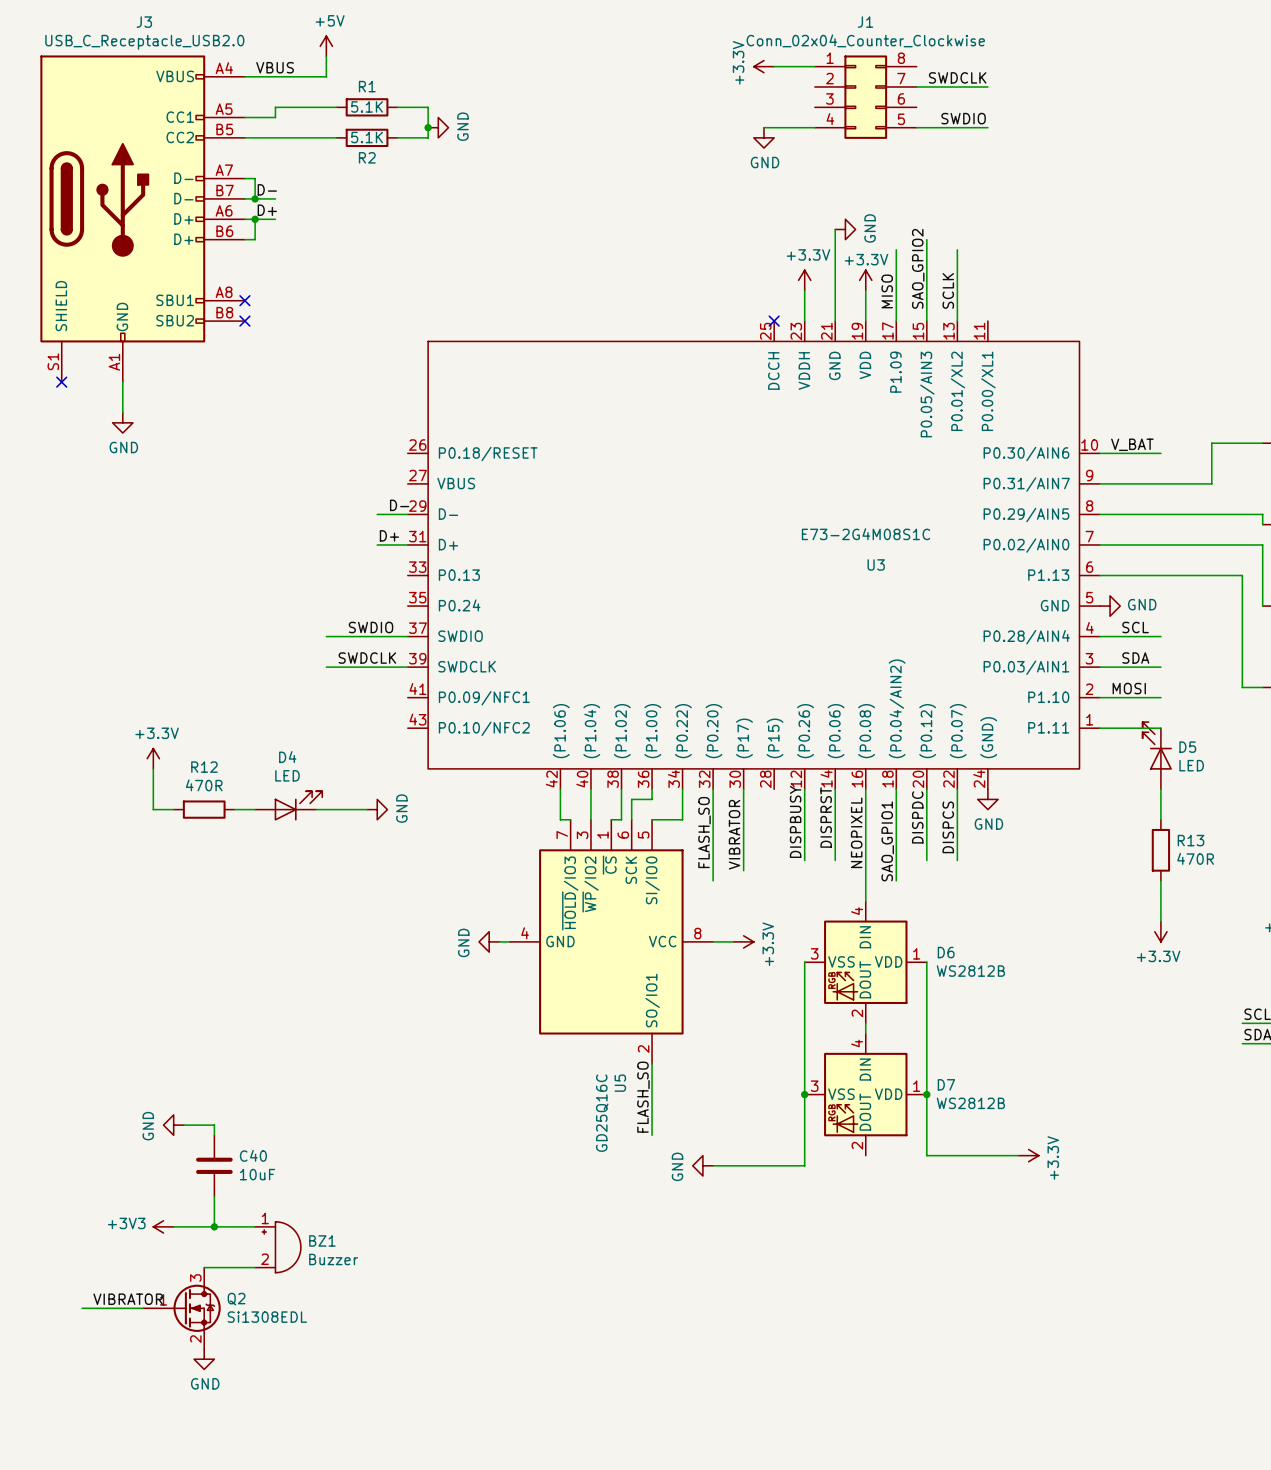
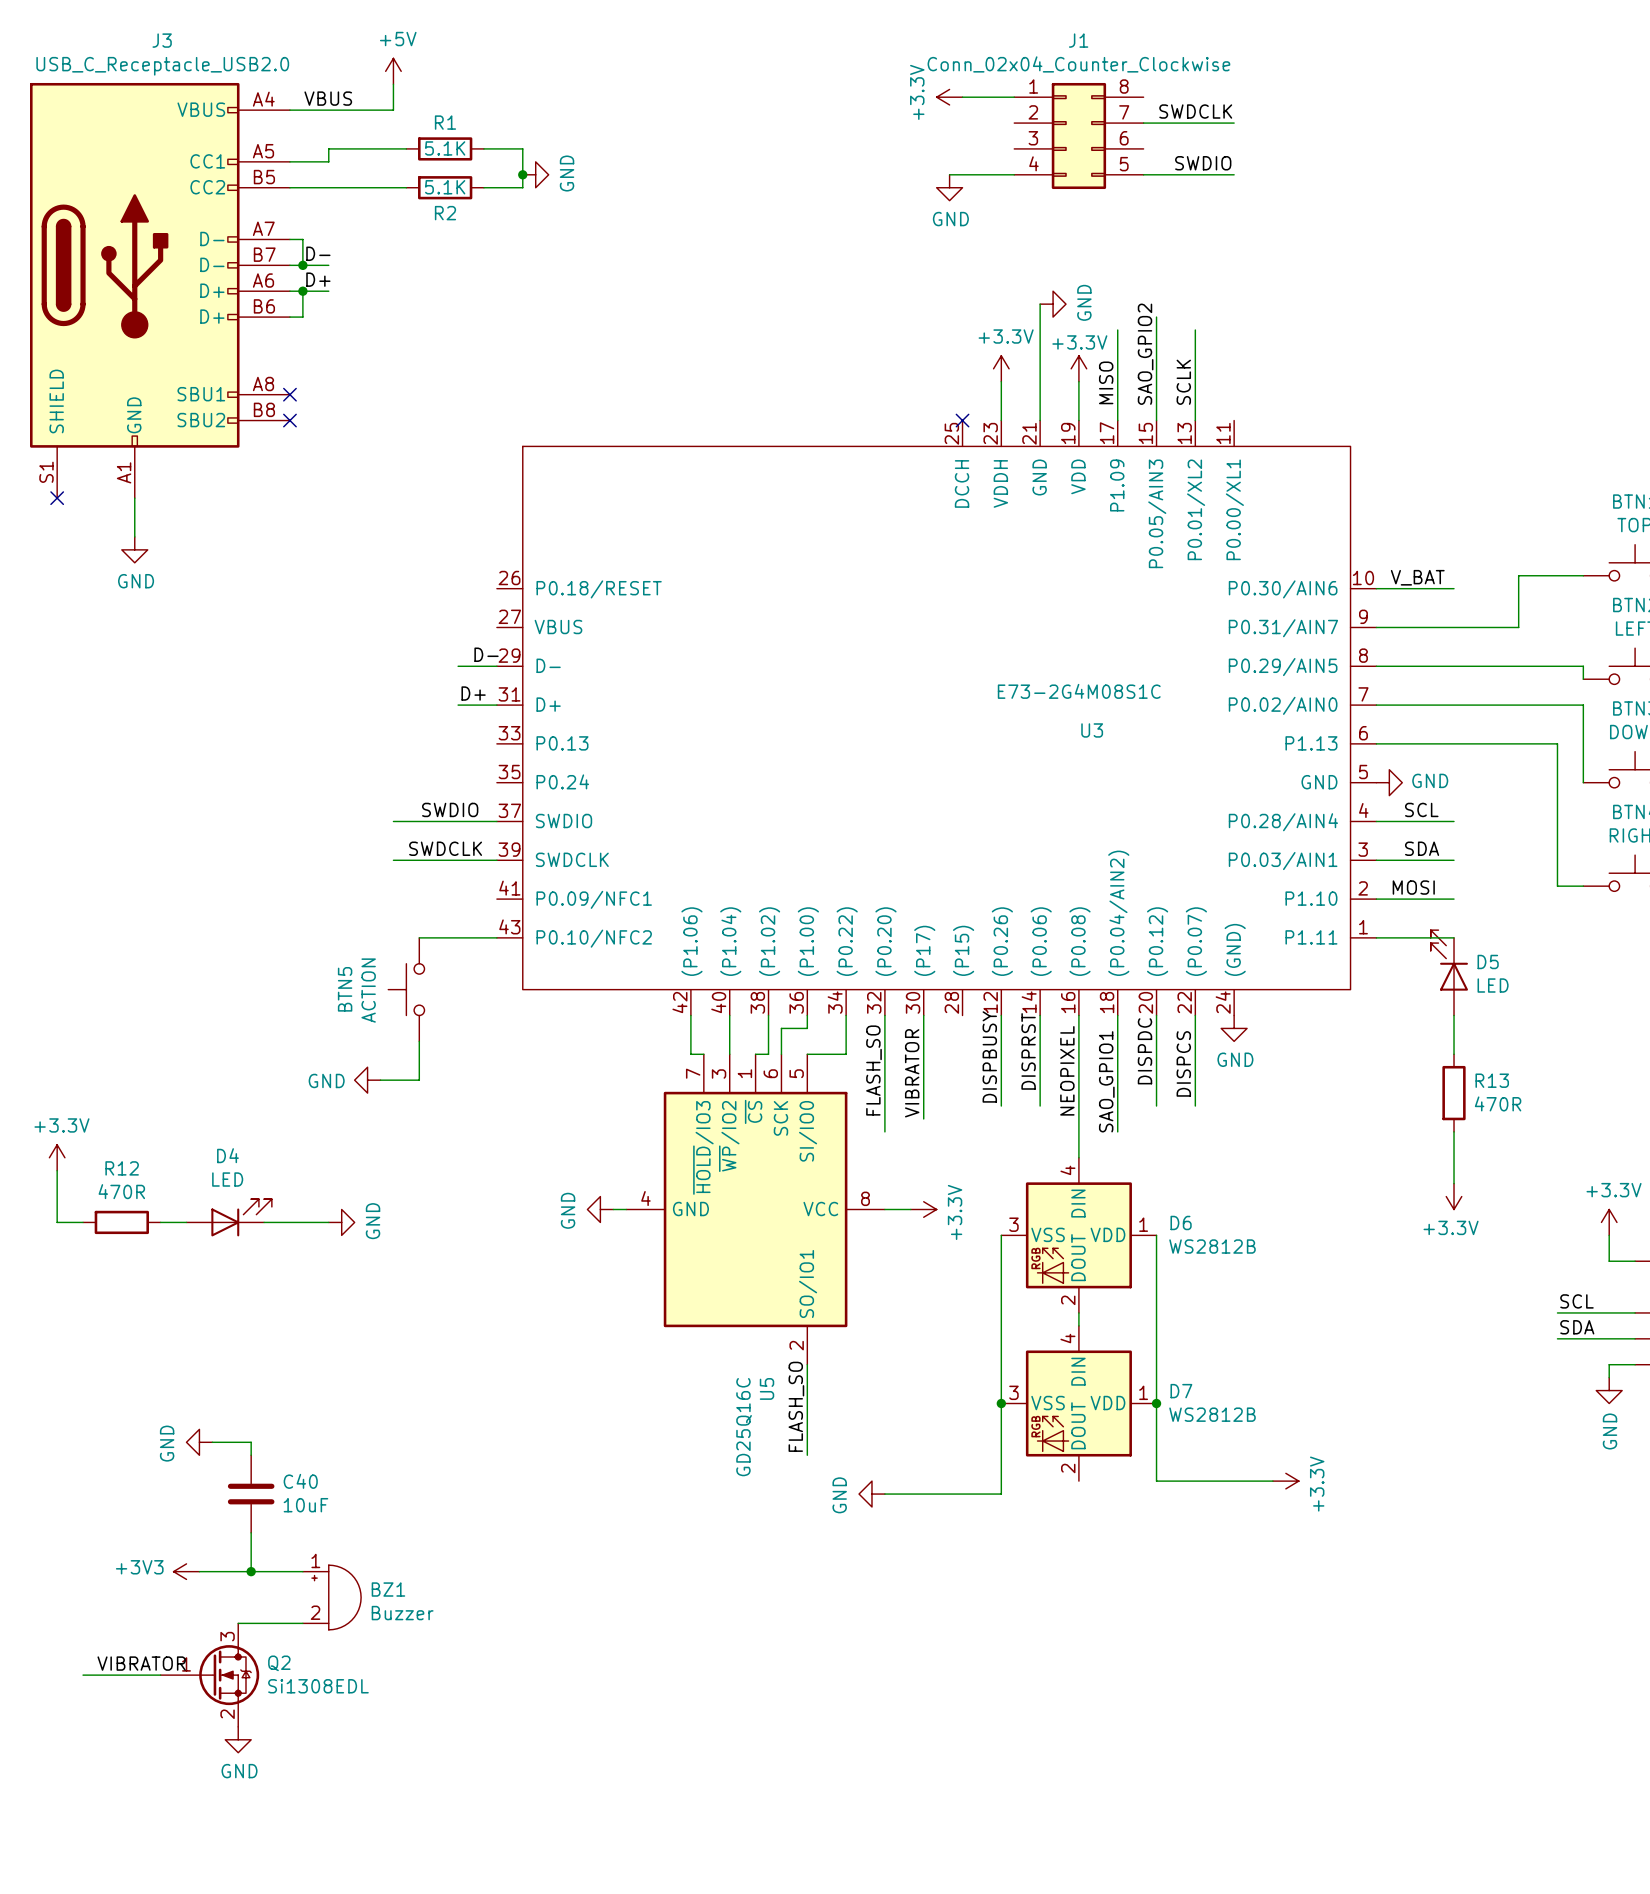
wire: none -> (419, 937) (496, 937)
power symbol position: +3.3V (153, 758) -> +3.3V (57, 1157)
wire: (153, 768) (153, 809) (173, 809) -> (57, 1170) (57, 1222) (83, 1222)
BTN5: none -> ACTION (406, 989)
D4 position: (288, 805) -> (229, 1217)
R12 position: (204, 809) -> (121, 1222)
wire: (234, 809) (255, 809) -> (160, 1222) (186, 1222)
wire: (316, 809) (367, 809) -> (264, 1222) (328, 1222)
wire: none -> (419, 1041) (419, 1080) (380, 1080)
power symbol rotation: 0° (377, 809) -> 180° (367, 1080)
power symbol position: GND (377, 809) -> GND (367, 1080)
power symbol: none -> GND (341, 1222)

